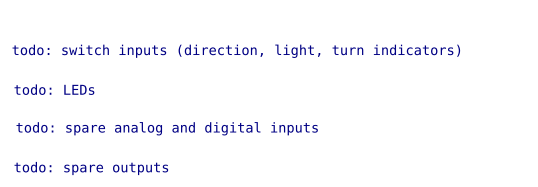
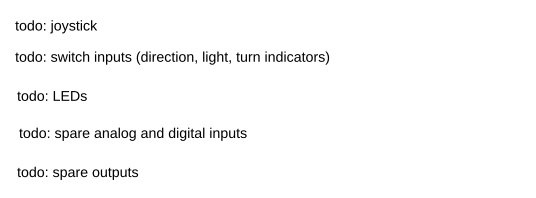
text: none -> todo: joystick (56, 26)

